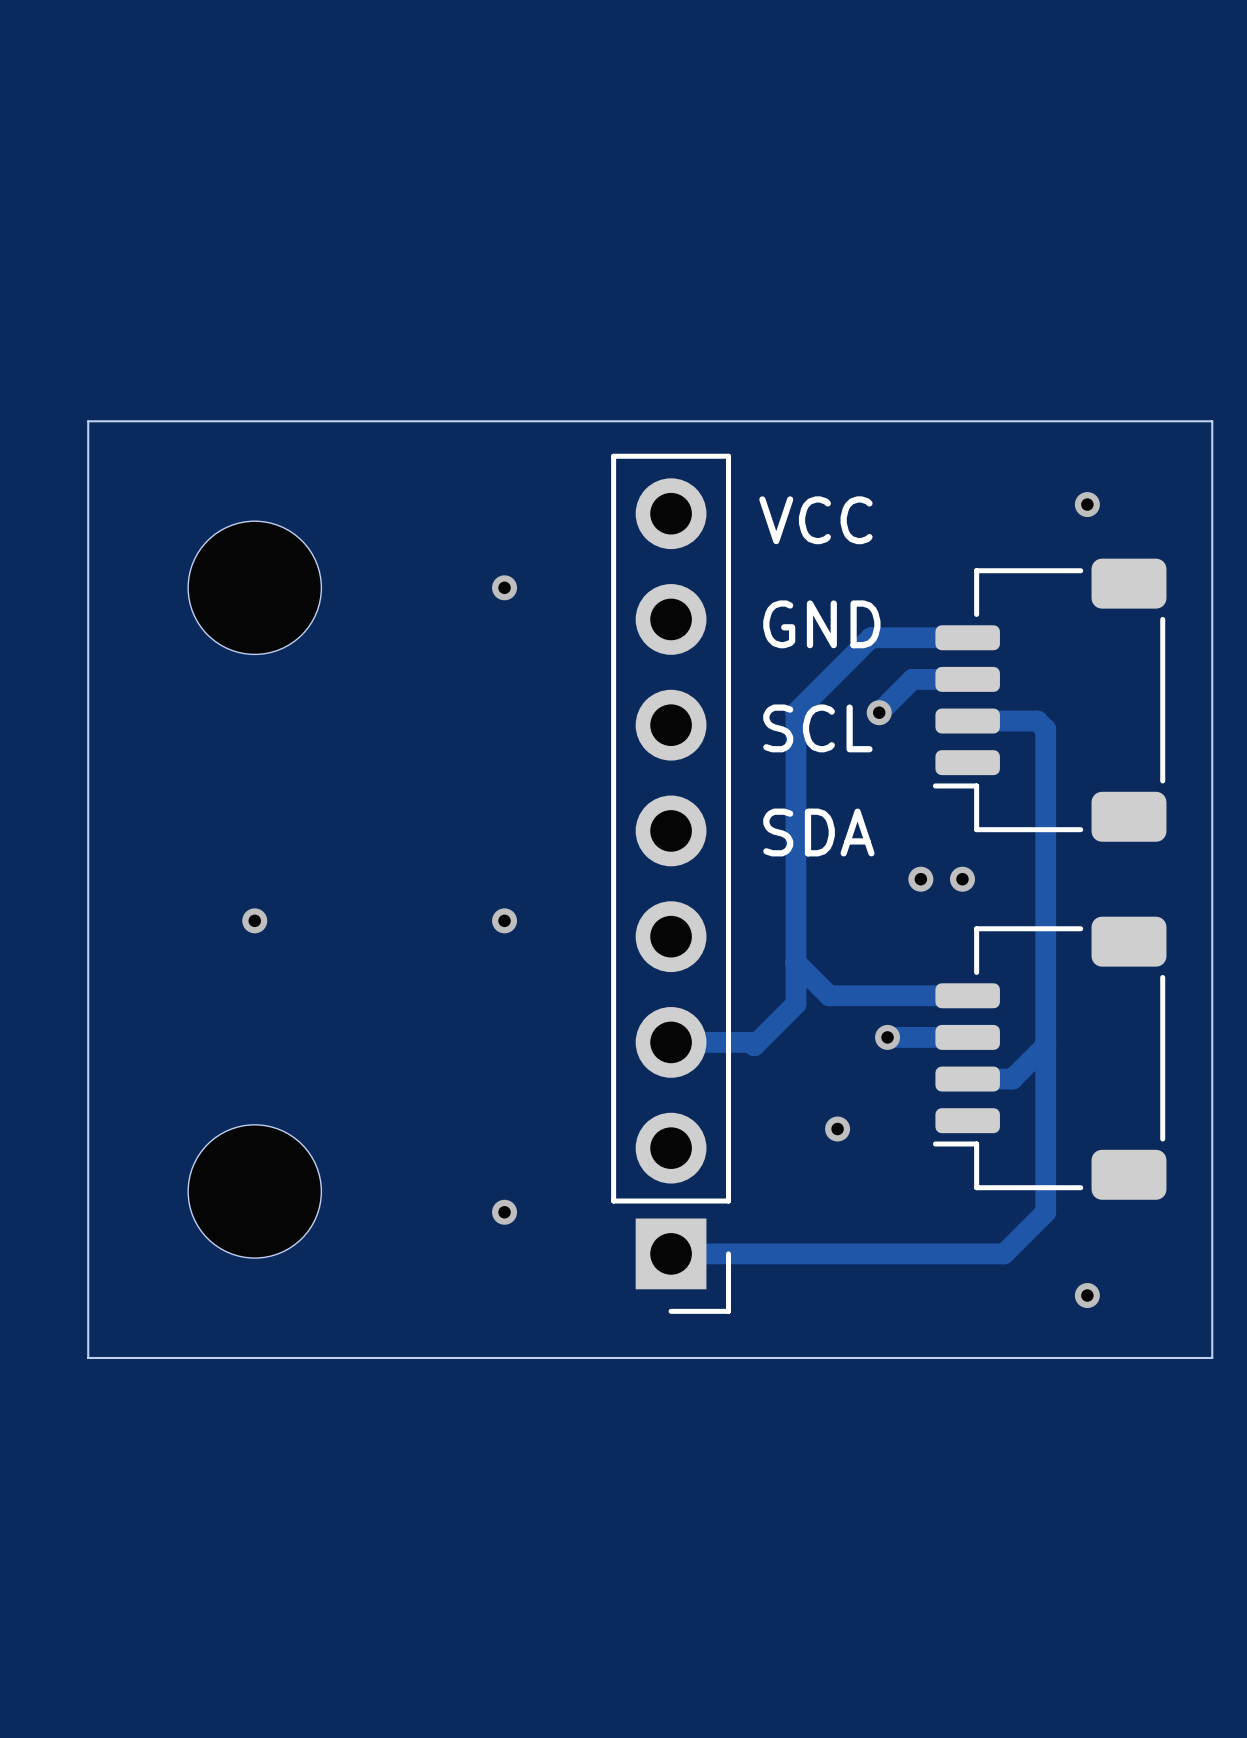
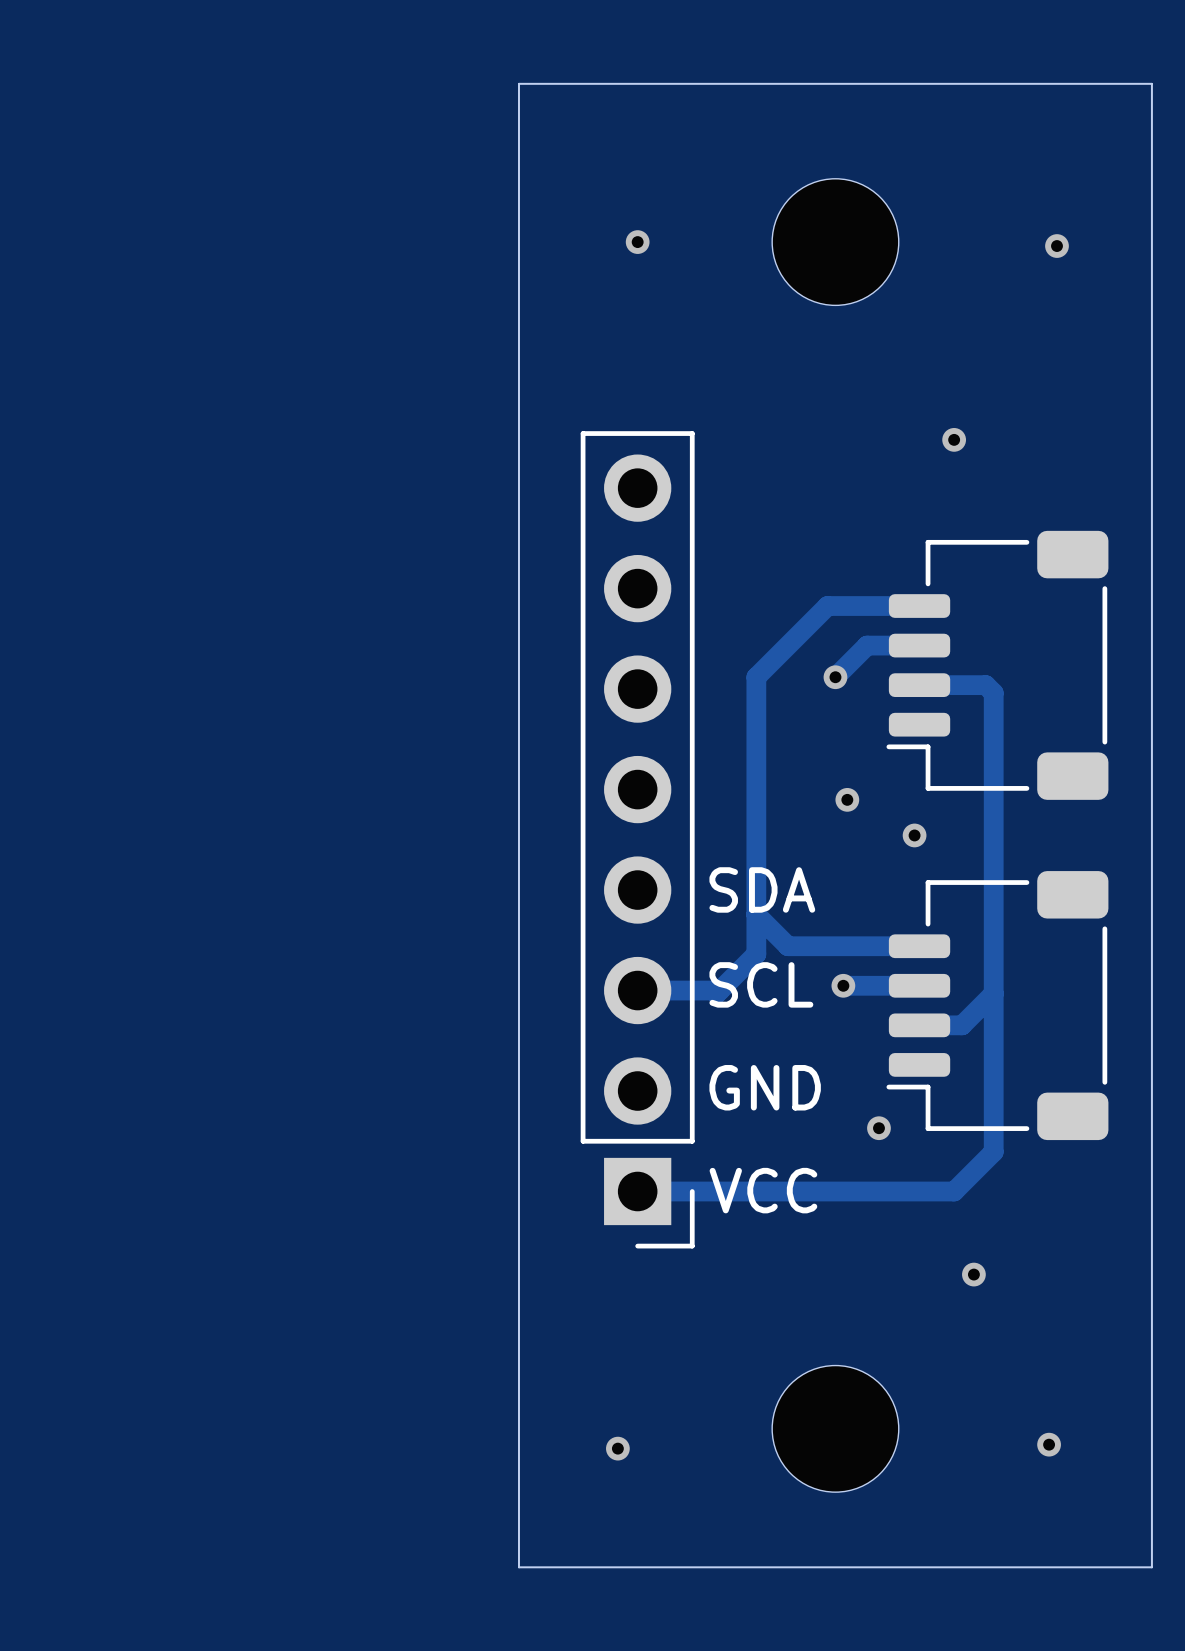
via: none -> (637, 242)
part: none -> (835, 242)
via: none -> (1056, 246)
board edge: (1212, 421) (88, 421) (88, 1357) (1212, 1357) -> (1151, 400) (1151, 83) (518, 83) (518, 1567) (1151, 1567) (1151, 1290)
via position: (1087, 504) -> (954, 439)
text position: VCC (815, 520) -> VCC (763, 1190)
part: (254, 587) -> none
via: (504, 587) -> none
text position: GND (821, 624) -> GND (765, 1087)
text position: SCL (817, 728) -> SCL (761, 984)
text position: SDA (818, 832) -> SDA (762, 889)
via position: (920, 879) -> (847, 799)
via: (254, 920) -> none
via: (504, 920) -> none
via: (837, 1129) -> none
via: none -> (878, 1128)
part: (254, 1191) -> none
via: (504, 1212) -> none
via position: (1087, 1295) -> (973, 1274)
part: none -> (835, 1428)
via: none -> (1049, 1444)
via: none -> (617, 1448)

